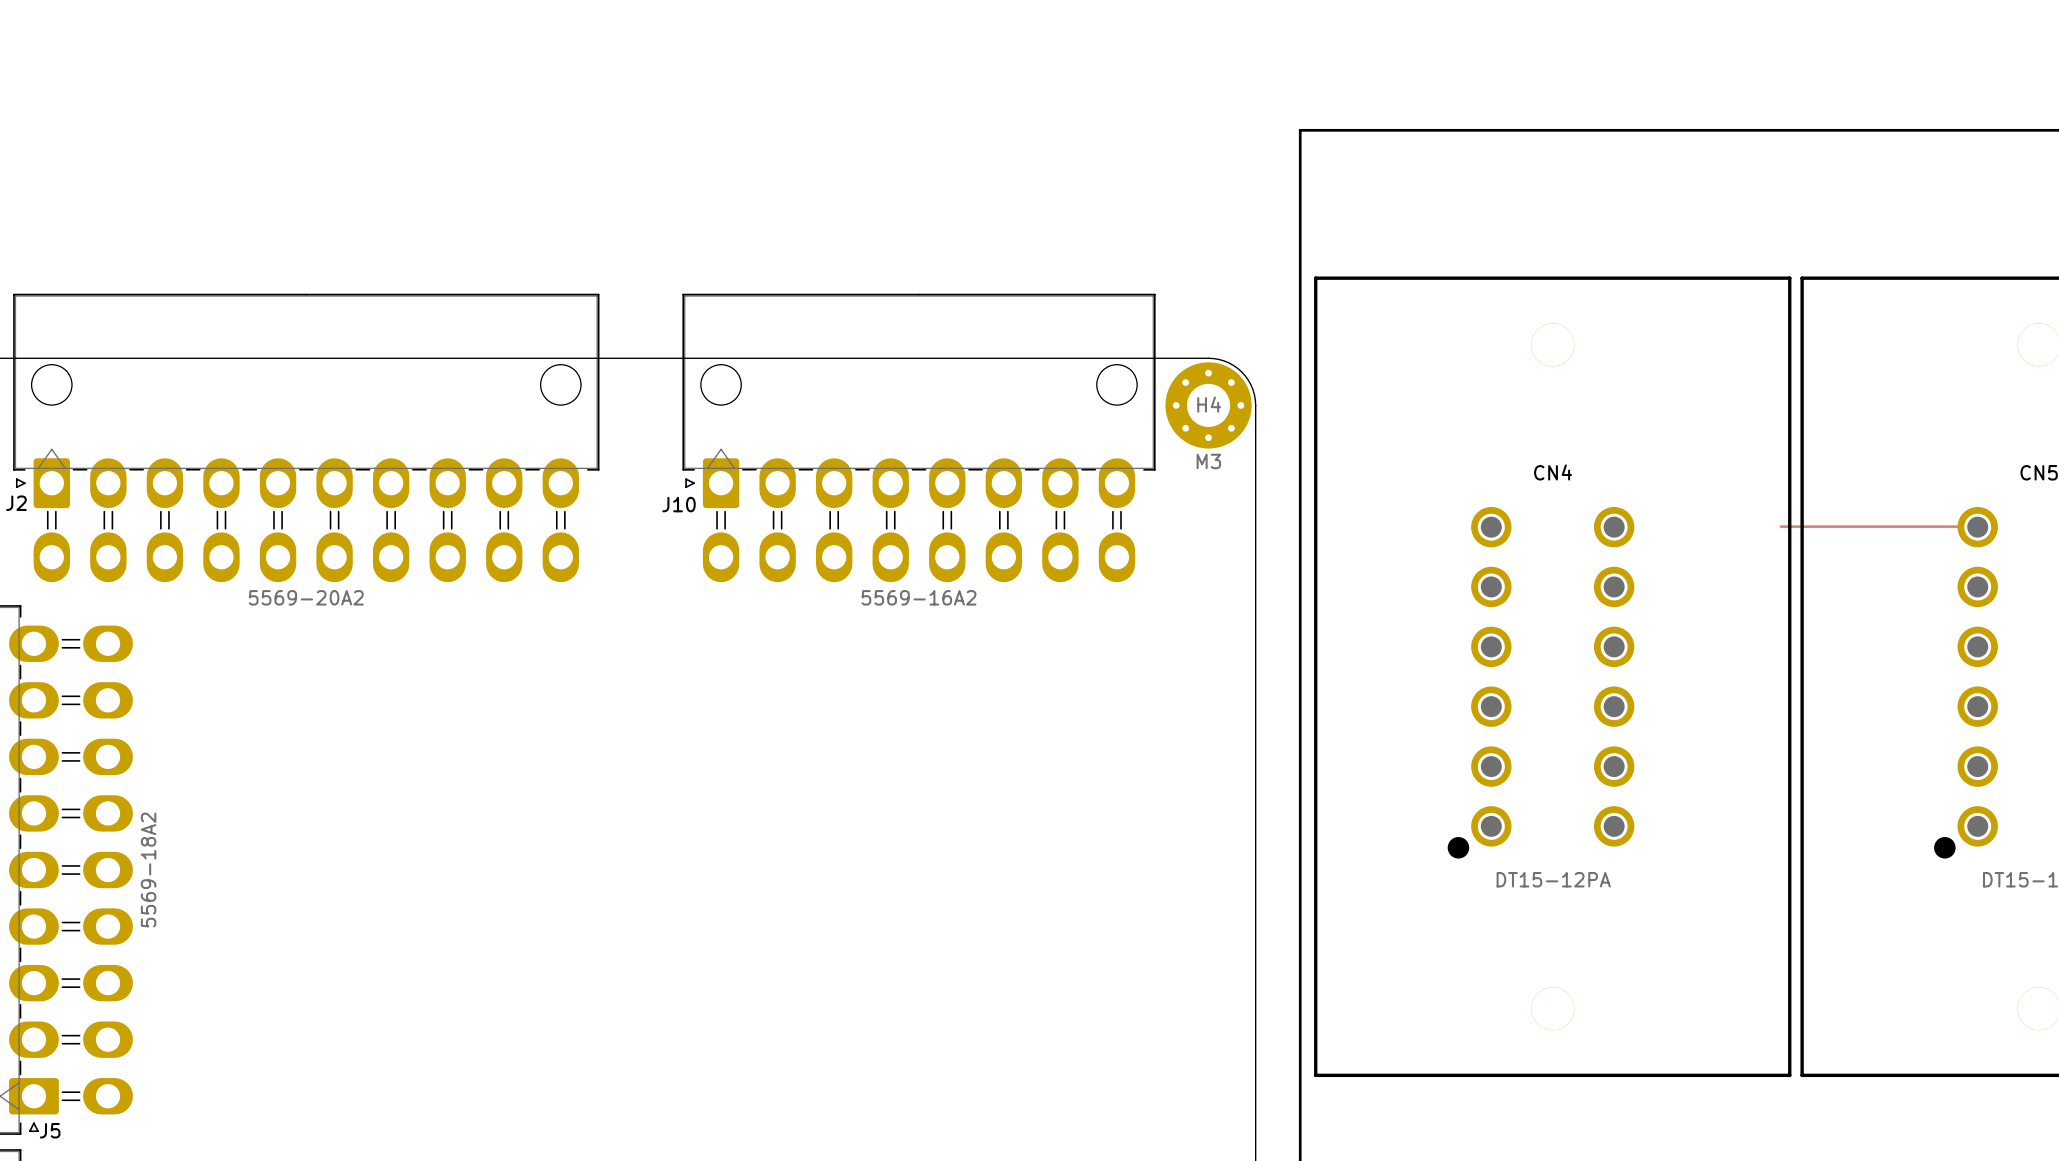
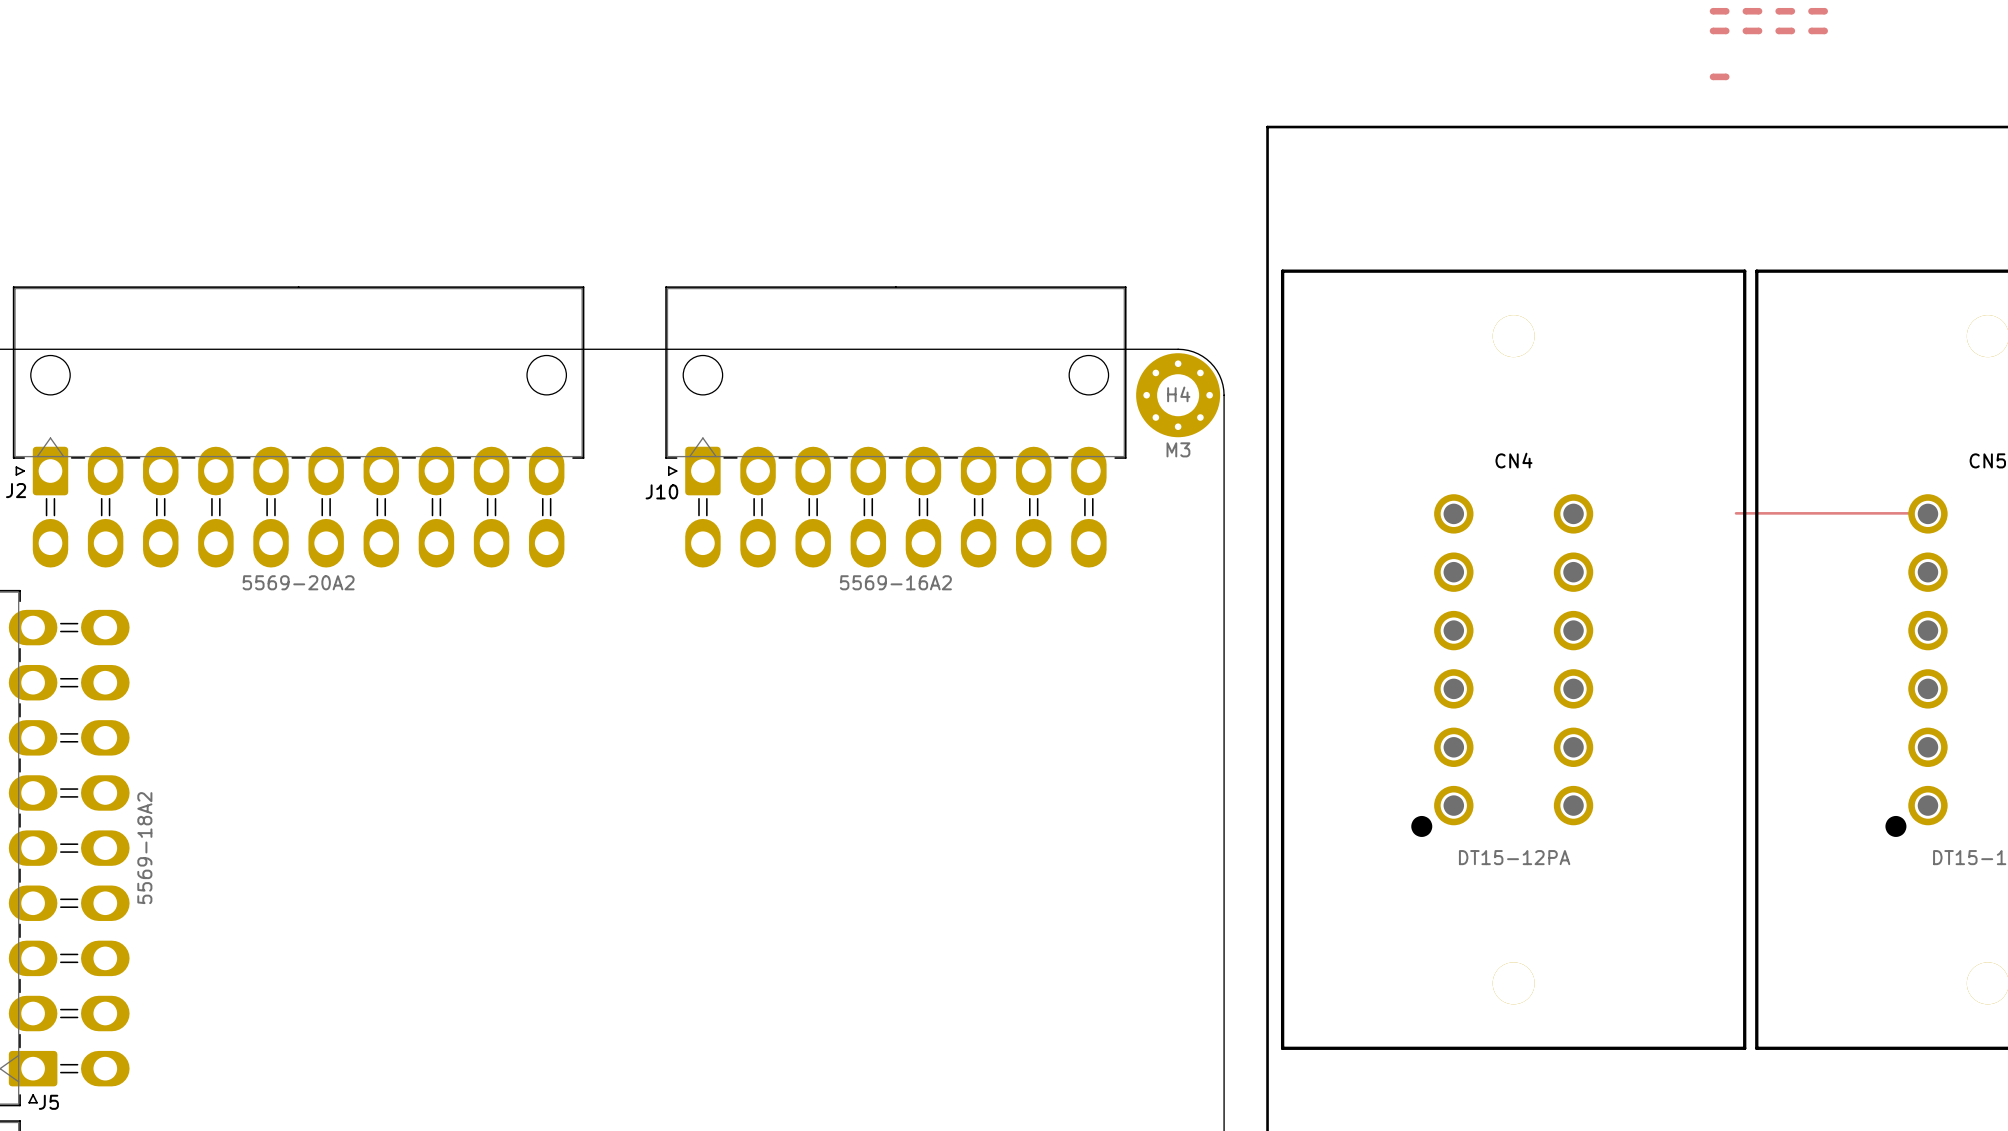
part: none -> (1719, 11)
part: none -> (1752, 11)
part: none -> (1785, 11)
part: none -> (1818, 11)
part: none -> (1719, 30)
part: none -> (1752, 30)
part: none -> (1785, 30)
part: none -> (1818, 30)
part: none -> (1719, 76)

